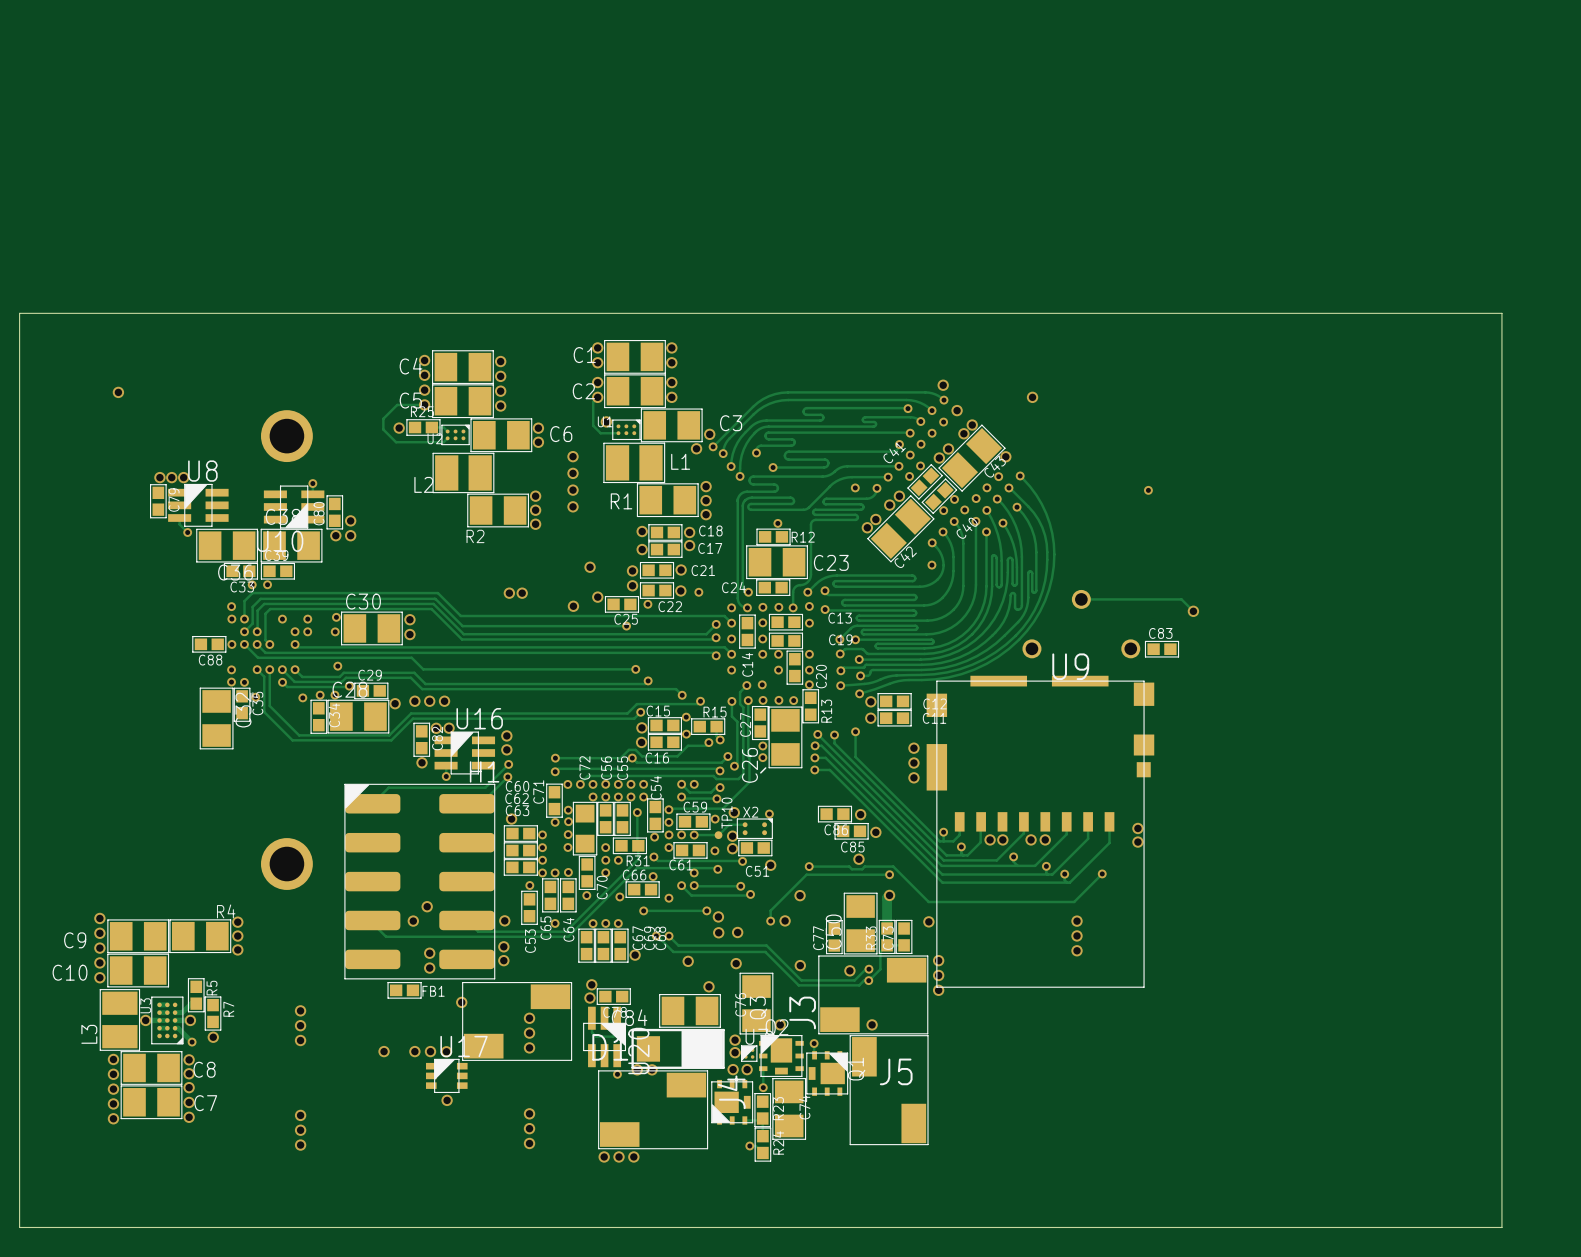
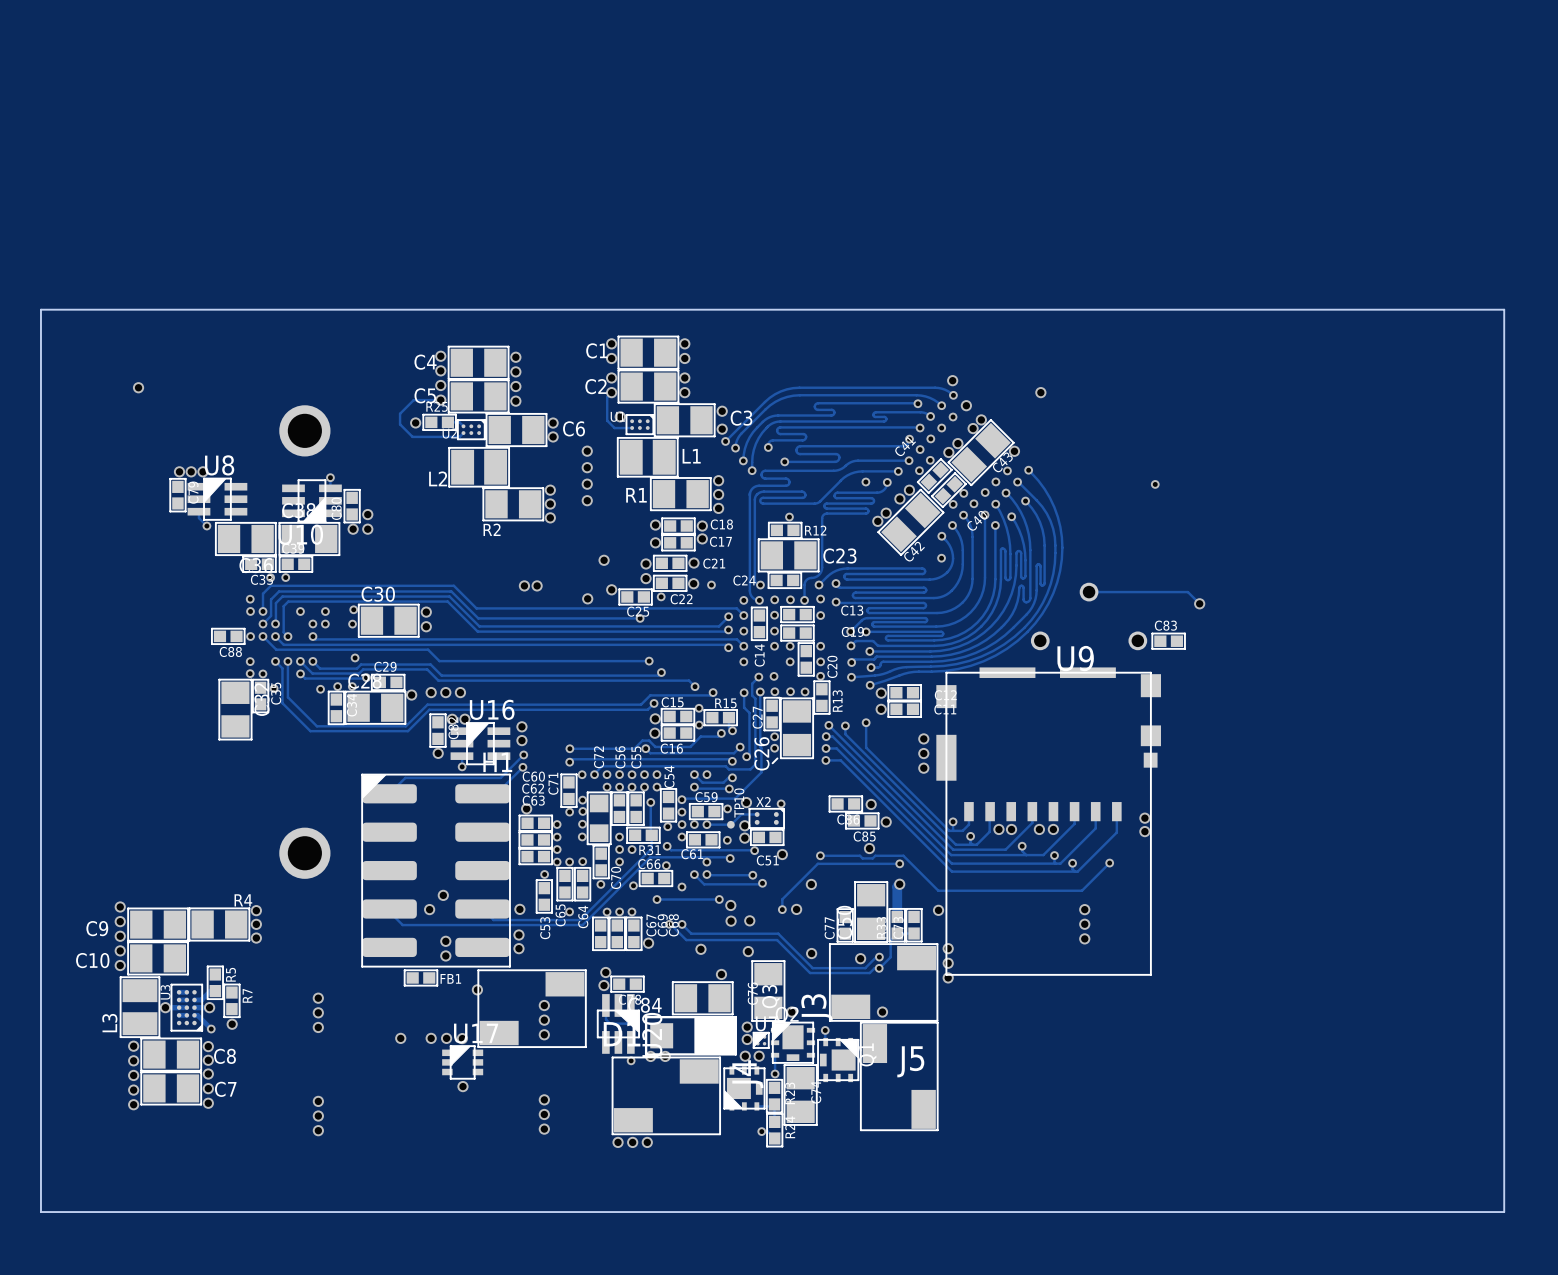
via position: (696, 448) -> (722, 411)

